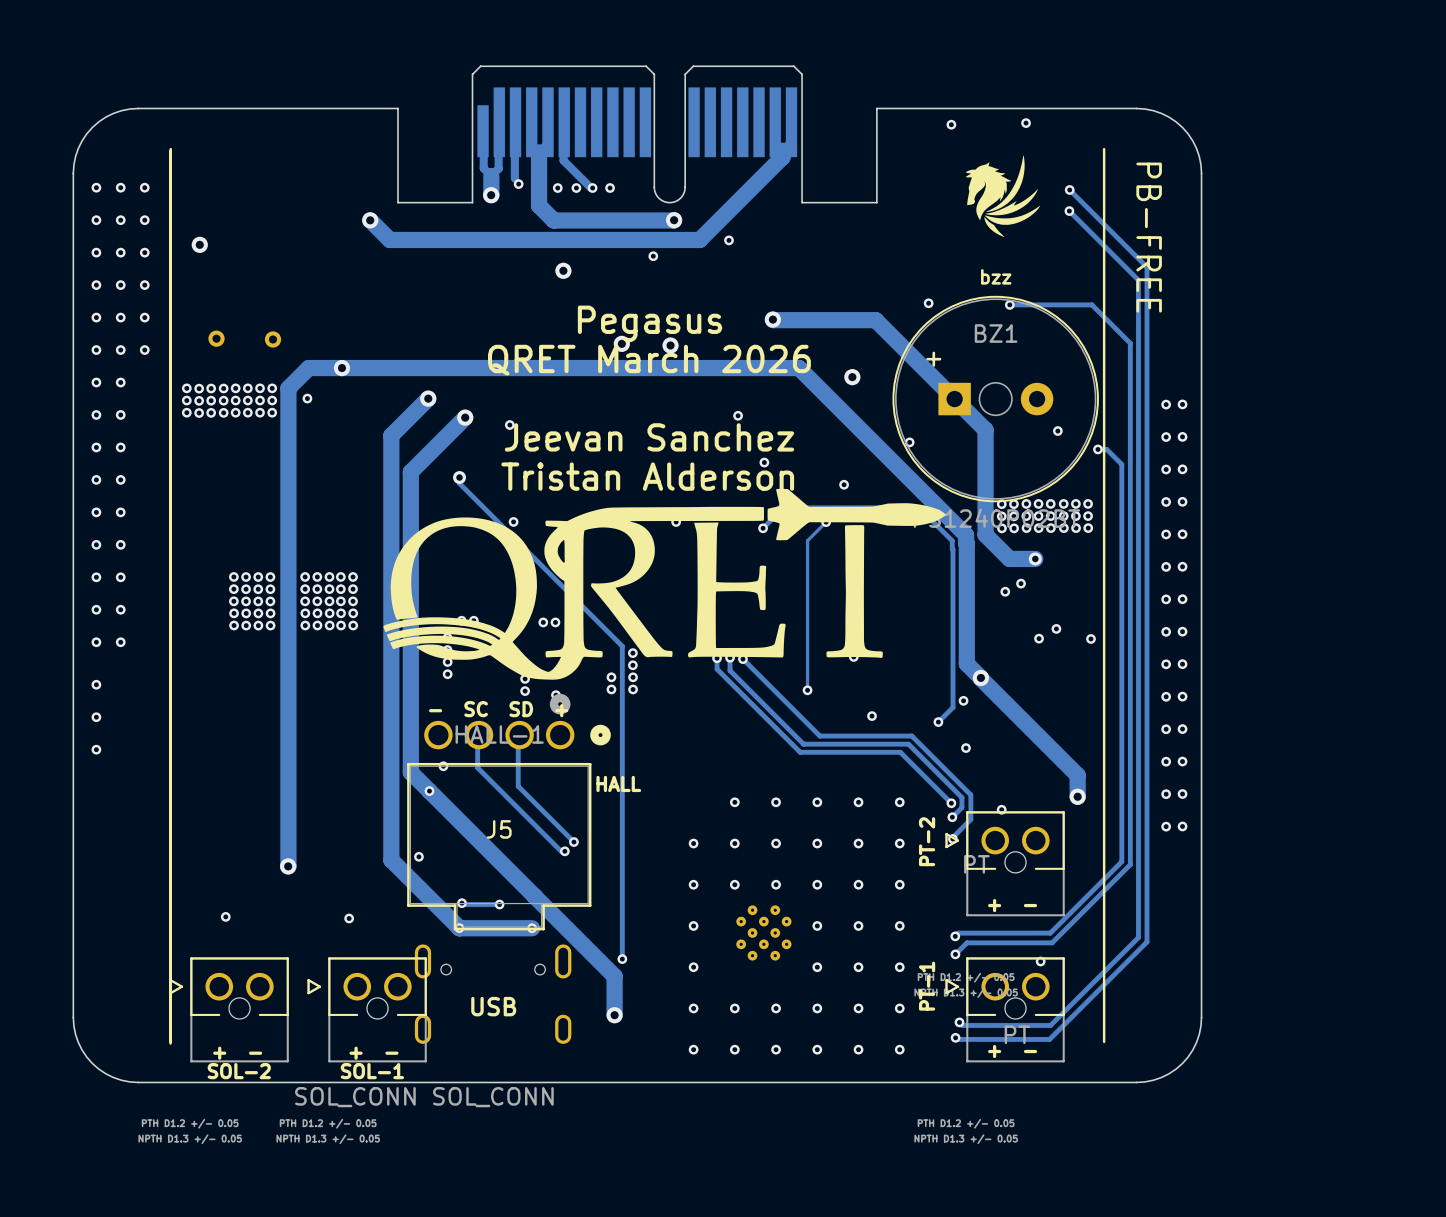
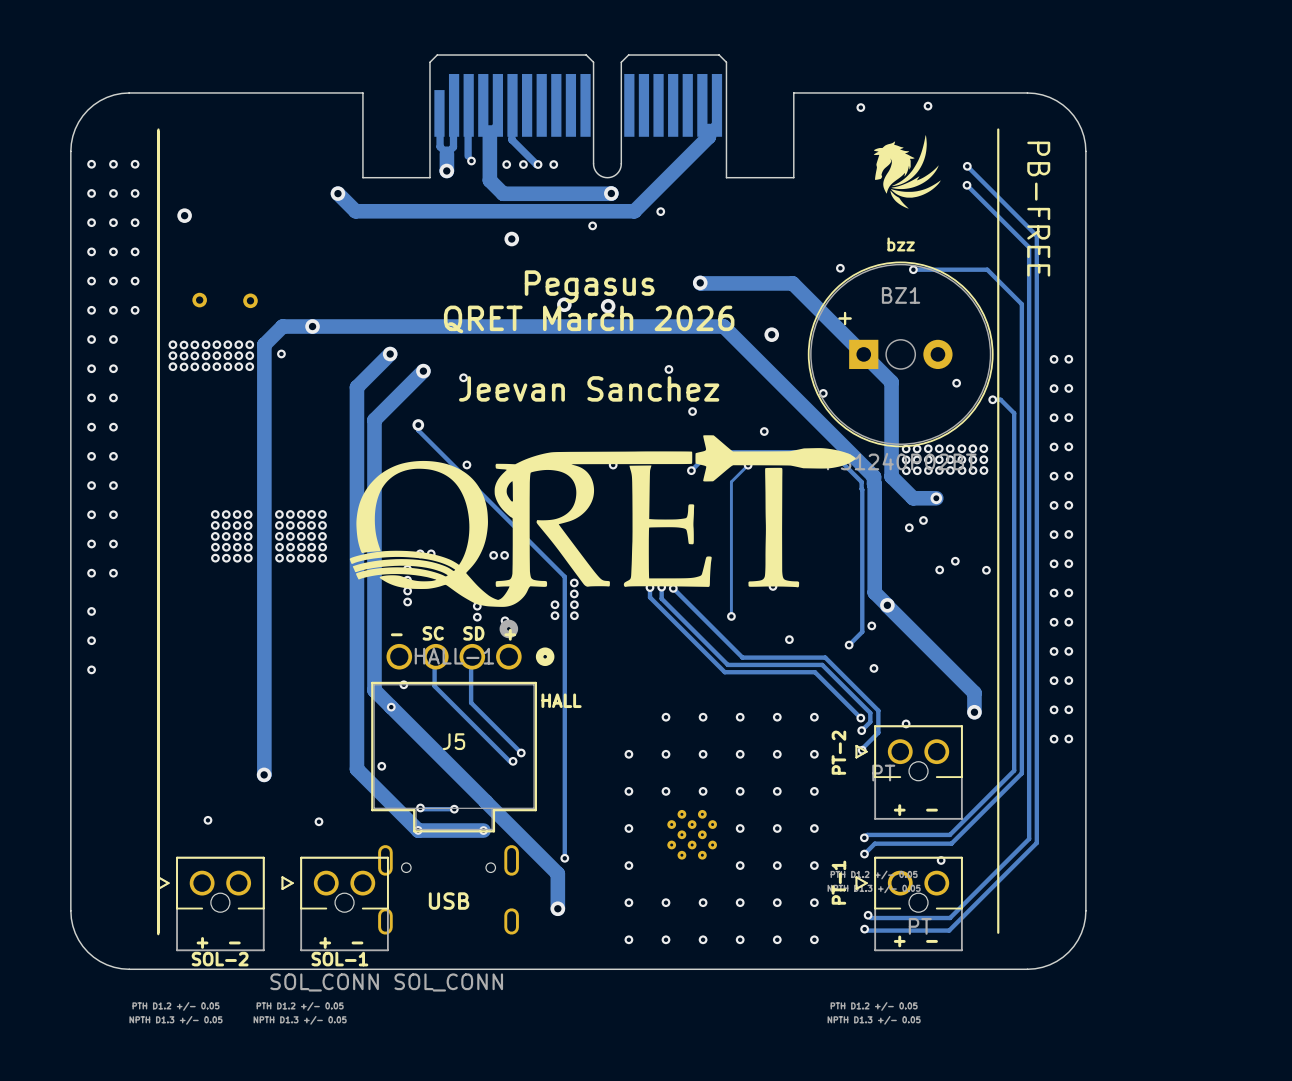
text: Tristan Alderson (647, 476) -> none

